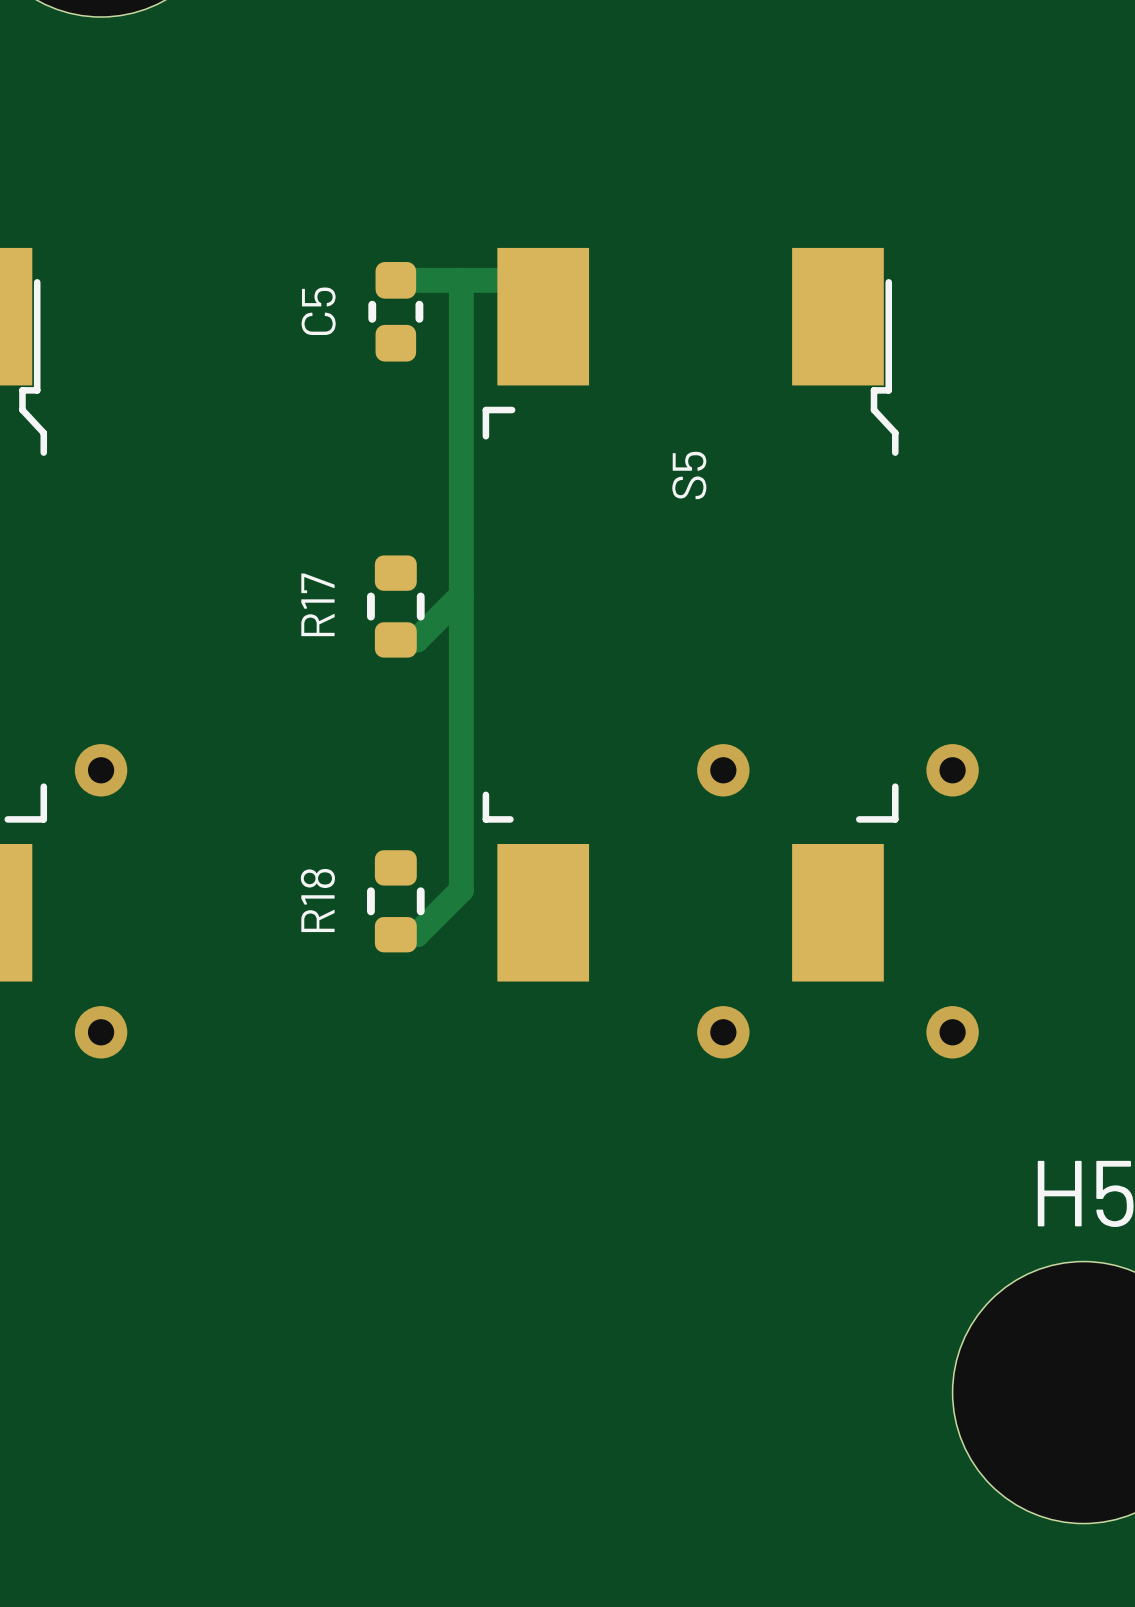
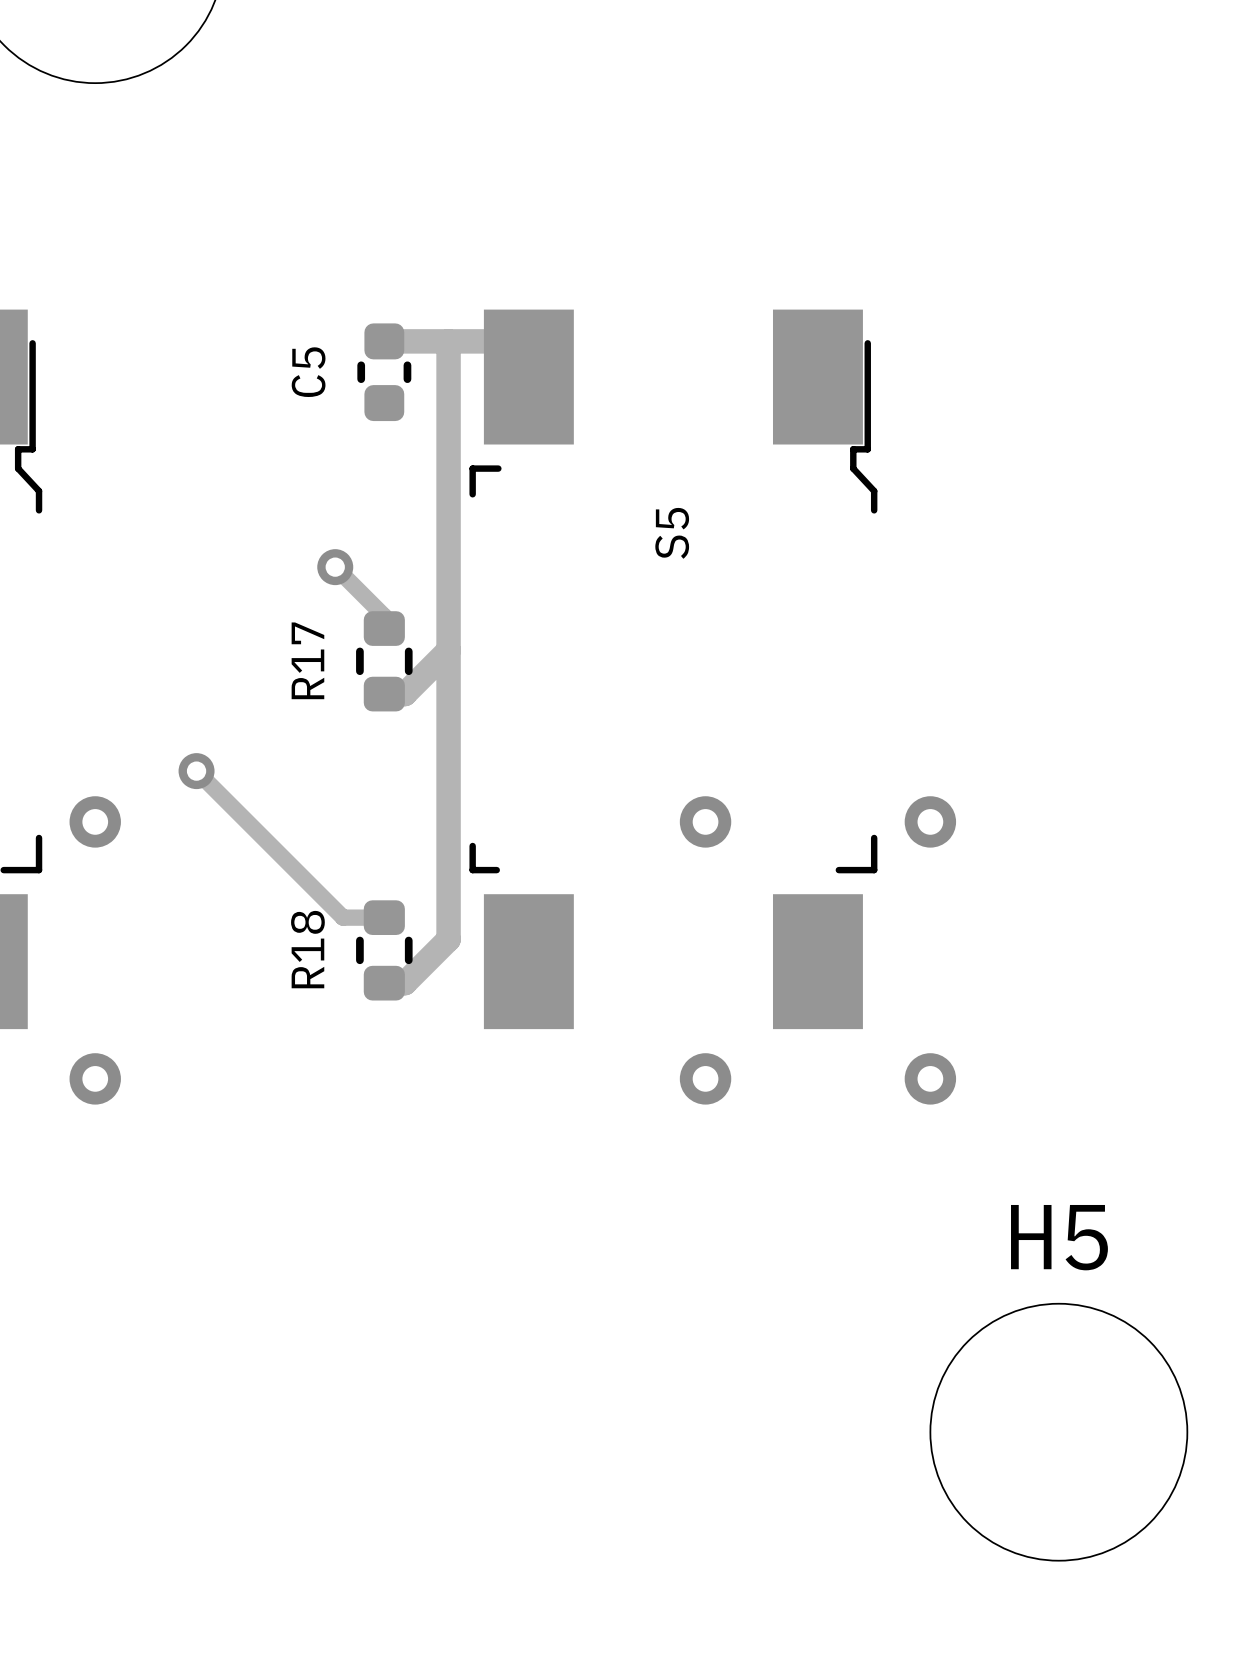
track: none -> (335, 567) (384, 616) (384, 628)
via: none -> (335, 567)
track: none -> (196, 771) (343, 917) (384, 917)
via: none -> (196, 771)

